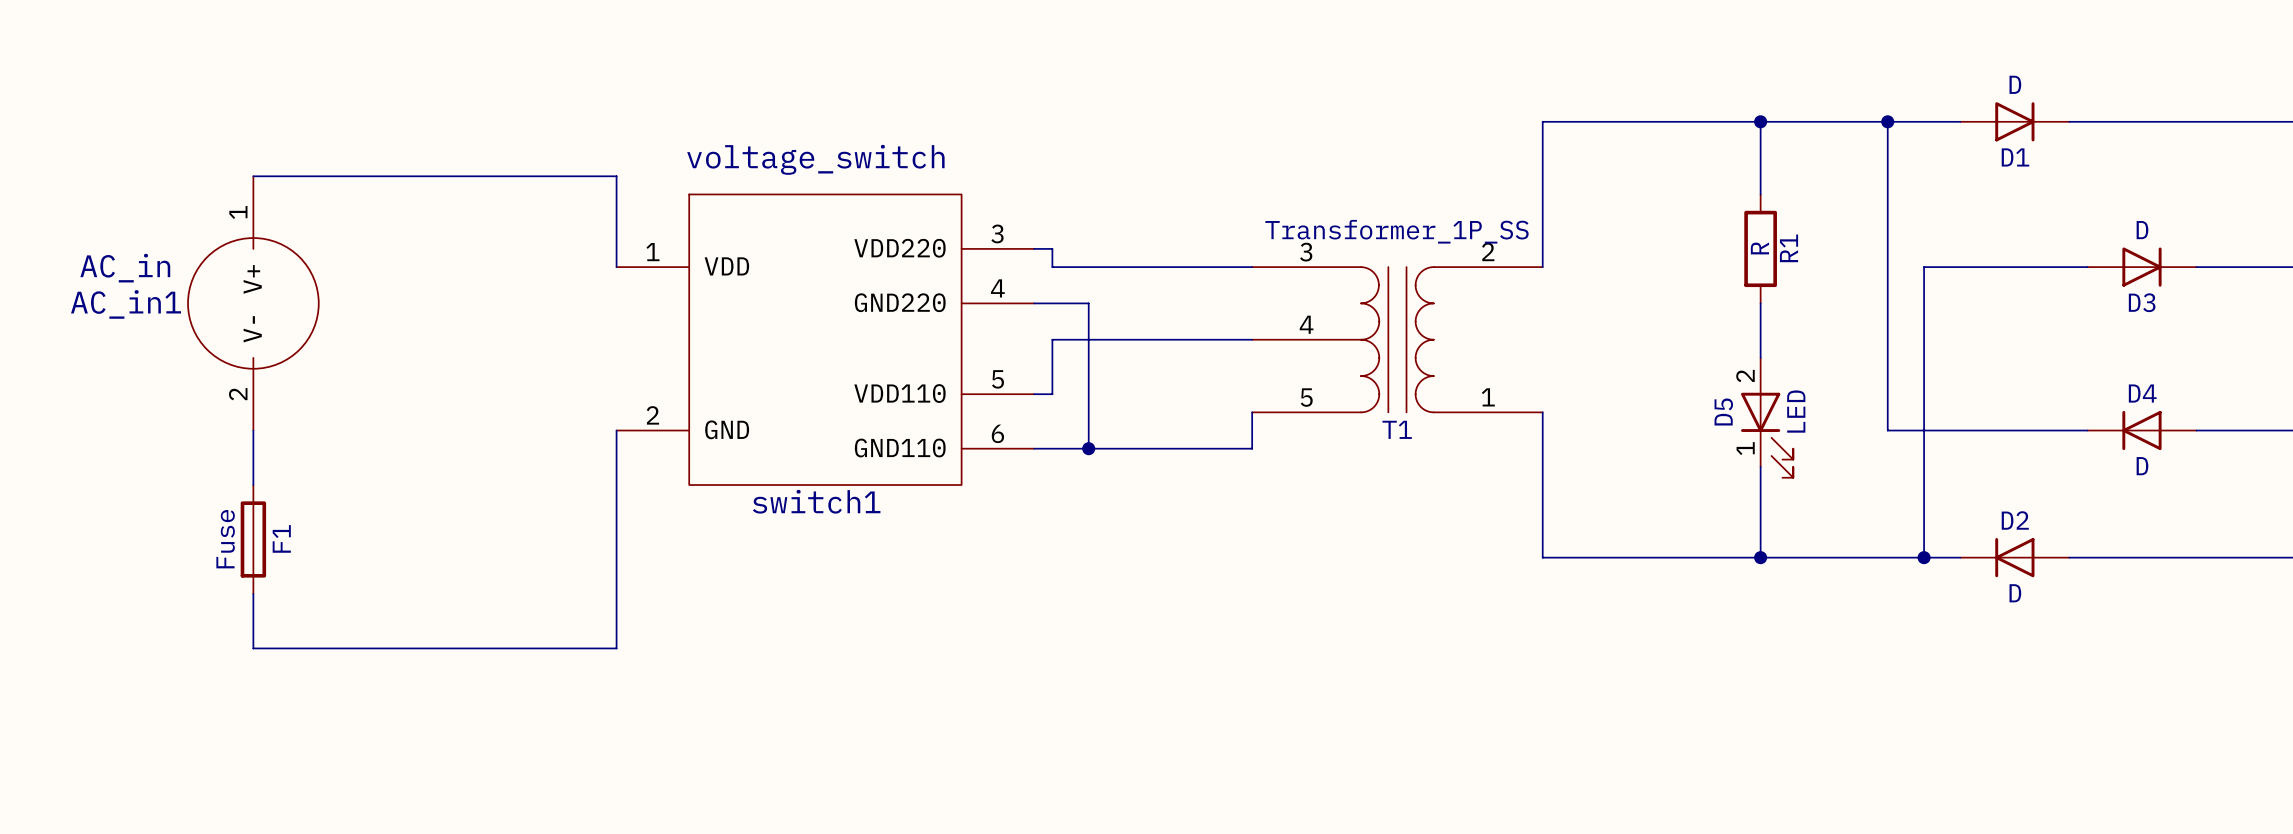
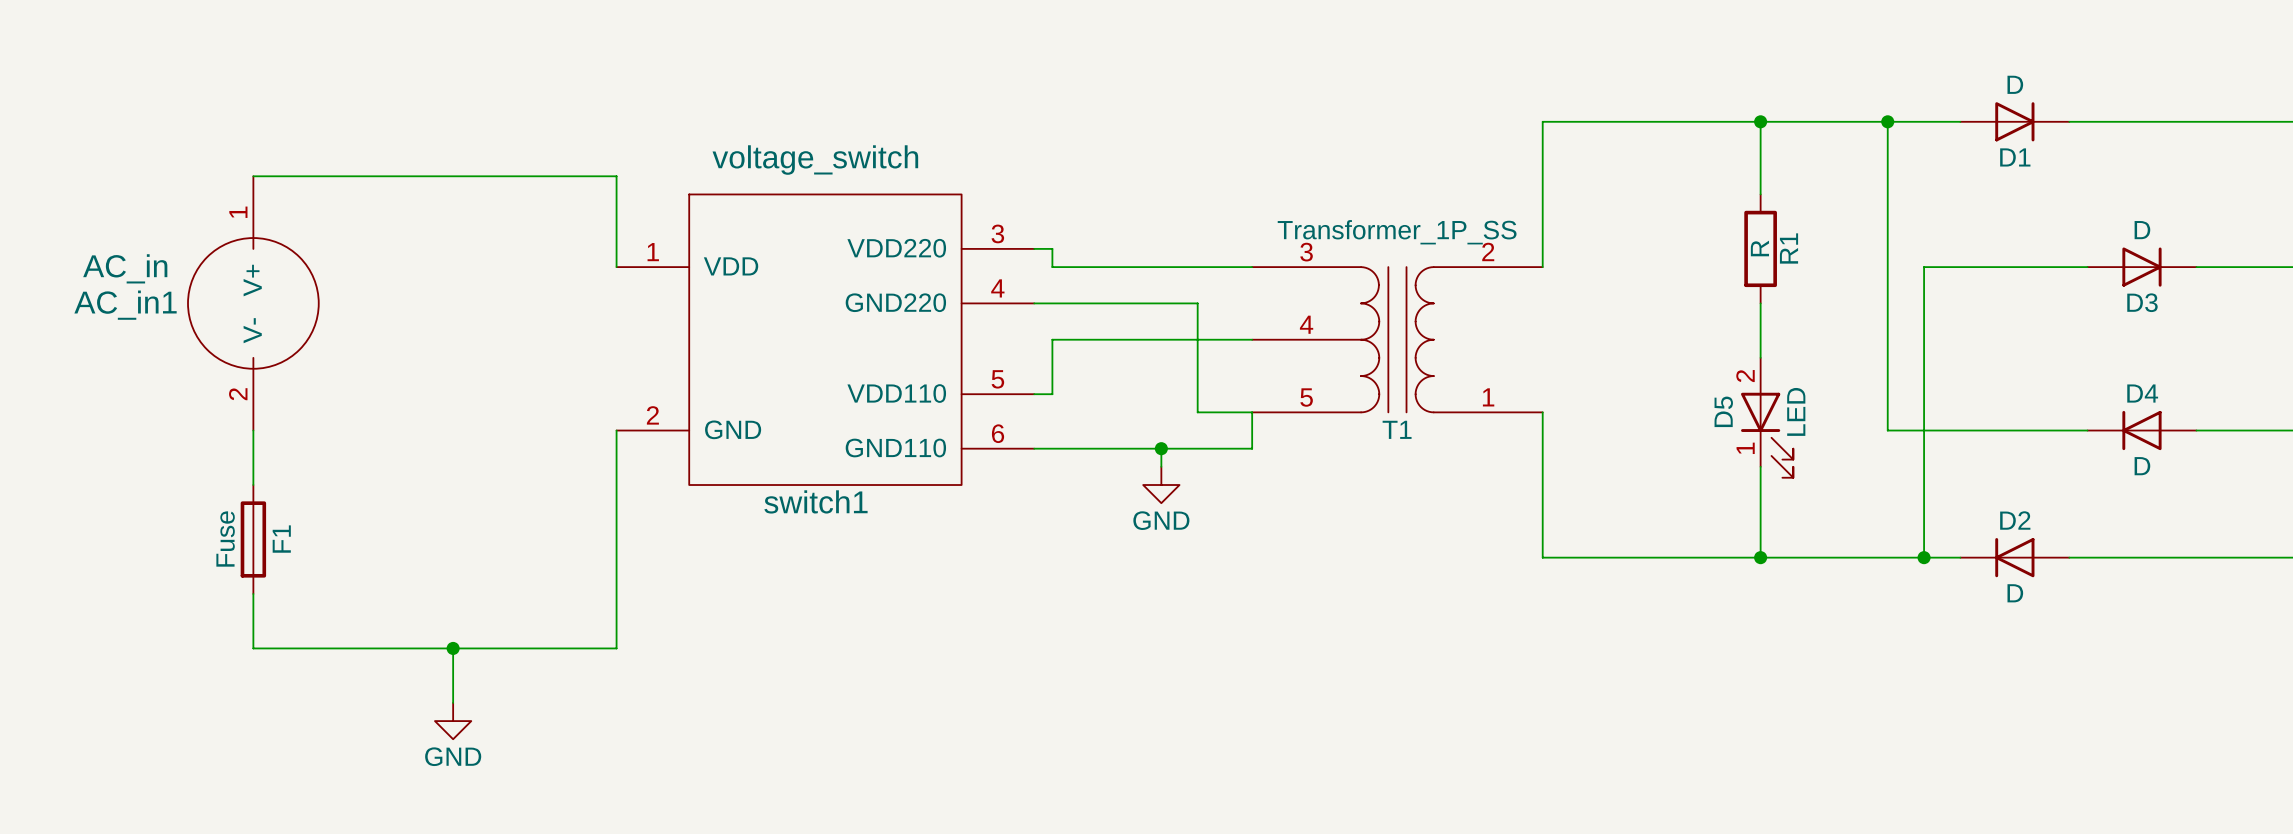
wire: (1088, 303) (1088, 448) -> (1088, 303) (1197, 303) (1197, 412) (1252, 412)
junction position: (1088, 448) -> (1161, 448)
wire: none -> (1161, 448) (1161, 466)
power symbol: none -> GND (1161, 485)
wire: none -> (453, 648) (453, 702)
junction: none -> (453, 648)
power symbol: none -> GND (453, 721)

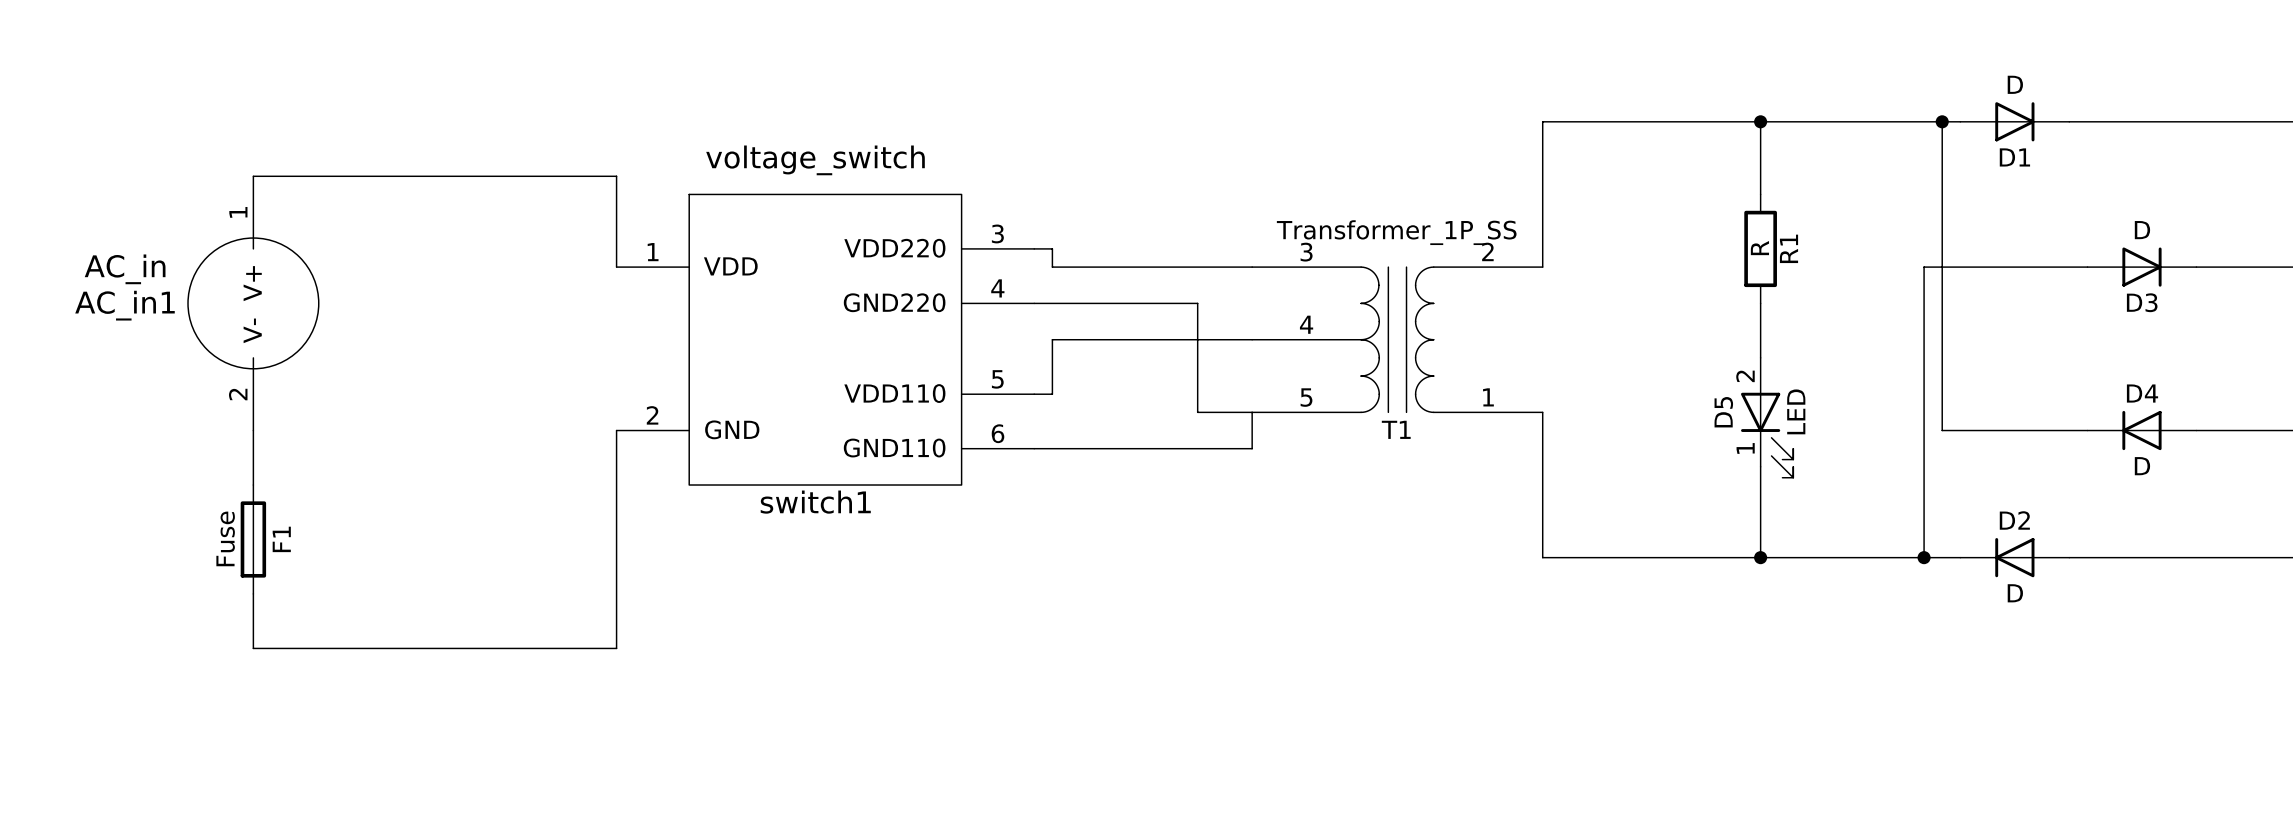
wire: (1887, 121) (1887, 430) (1942, 430) -> (1942, 121) (1942, 430)
junction position: (1887, 121) -> (1942, 121)
wire: (1161, 448) (1161, 466) -> none
junction: (1161, 448) -> none
power symbol: GND (1161, 485) -> none
wire: (453, 648) (453, 702) -> none
junction: (453, 648) -> none
power symbol: GND (453, 721) -> none

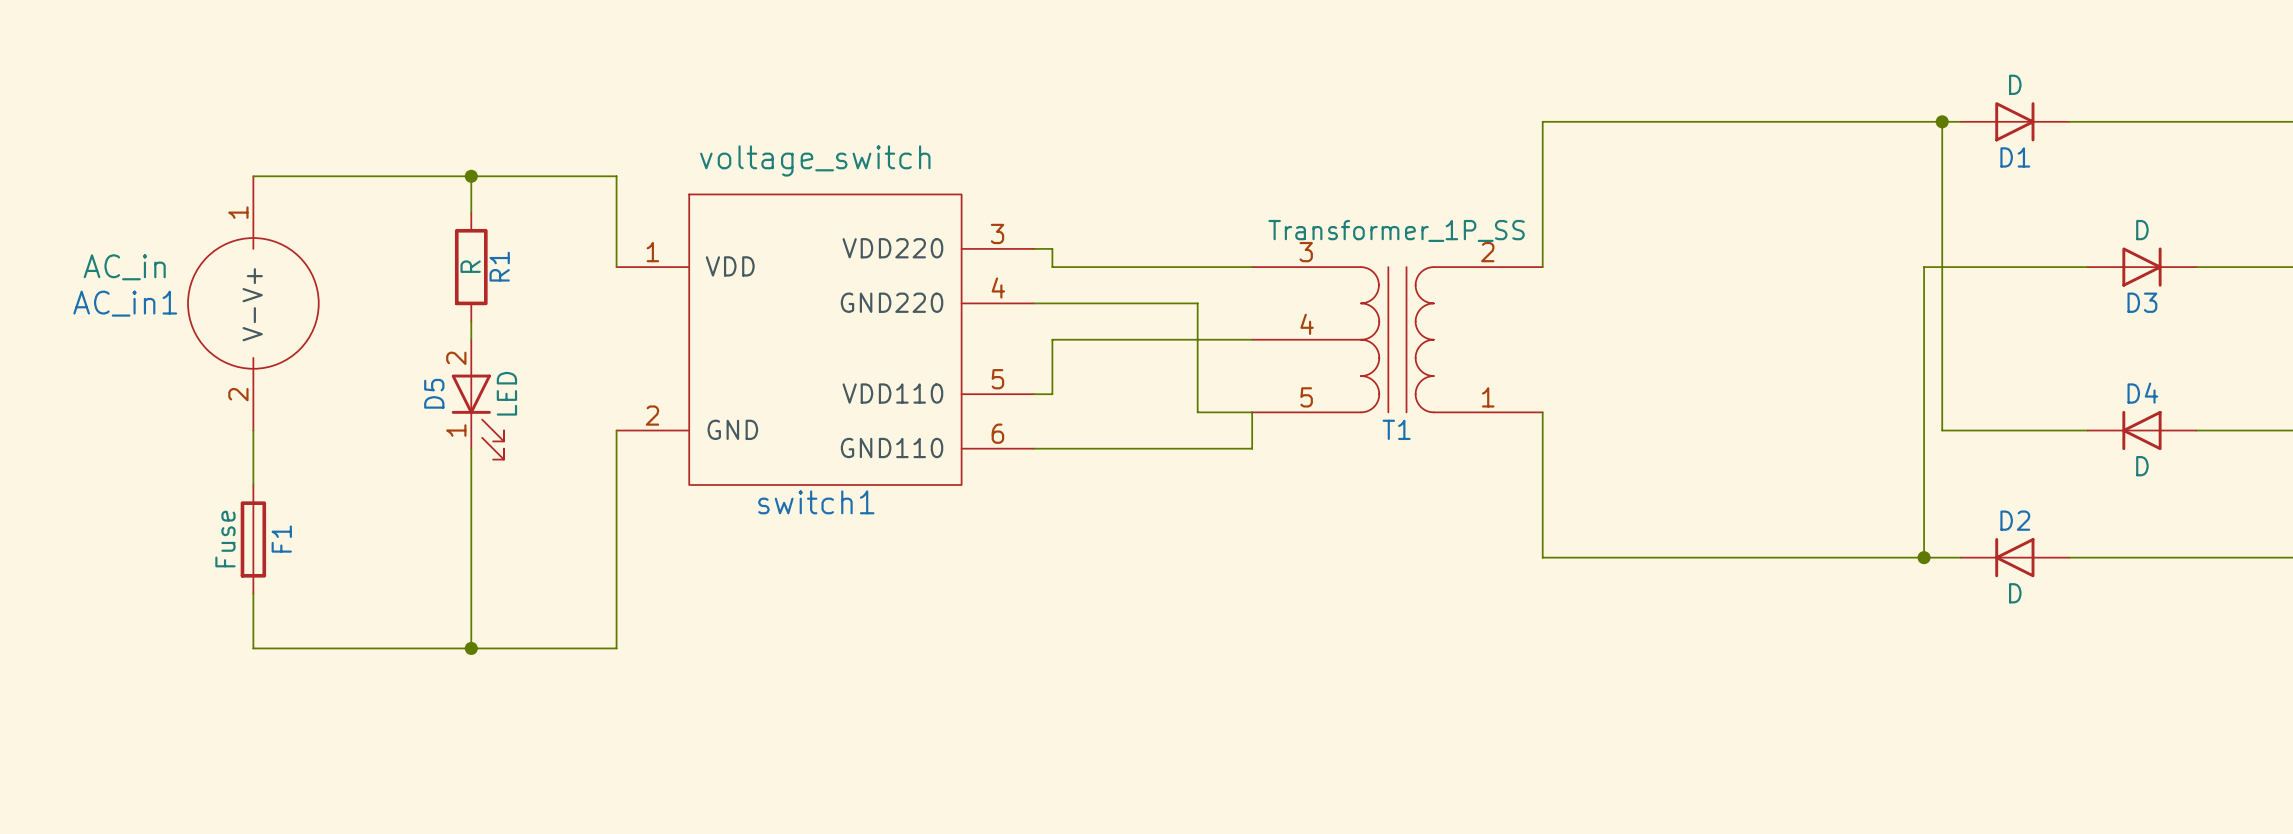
wire: (1760, 121) (1760, 194) -> none
junction: (1760, 121) -> none
wire: none -> (471, 176) (471, 212)
junction: none -> (471, 176)
R1 position: (1760, 248) -> (471, 267)
wire: (1760, 303) (1760, 357) -> none
wire: none -> (471, 321) (471, 339)
D5 position: (1767, 417) -> (477, 399)
wire: none -> (471, 448) (471, 648)
wire: (1760, 466) (1760, 557) -> none
junction: (1760, 557) -> none
junction: none -> (471, 648)

